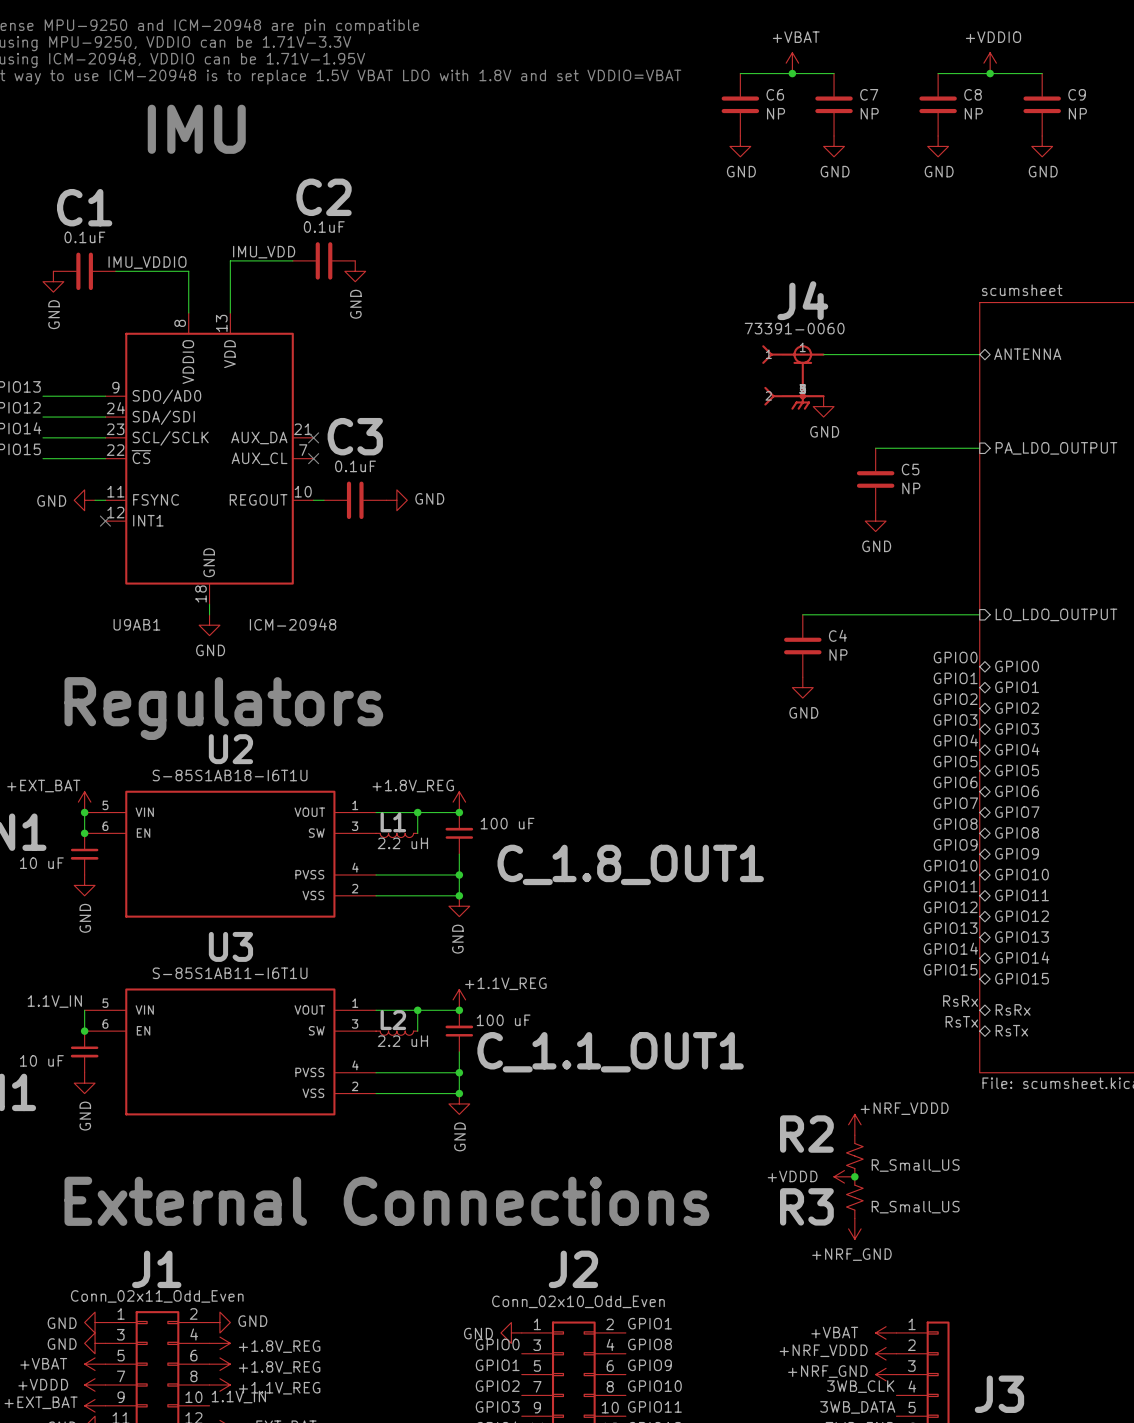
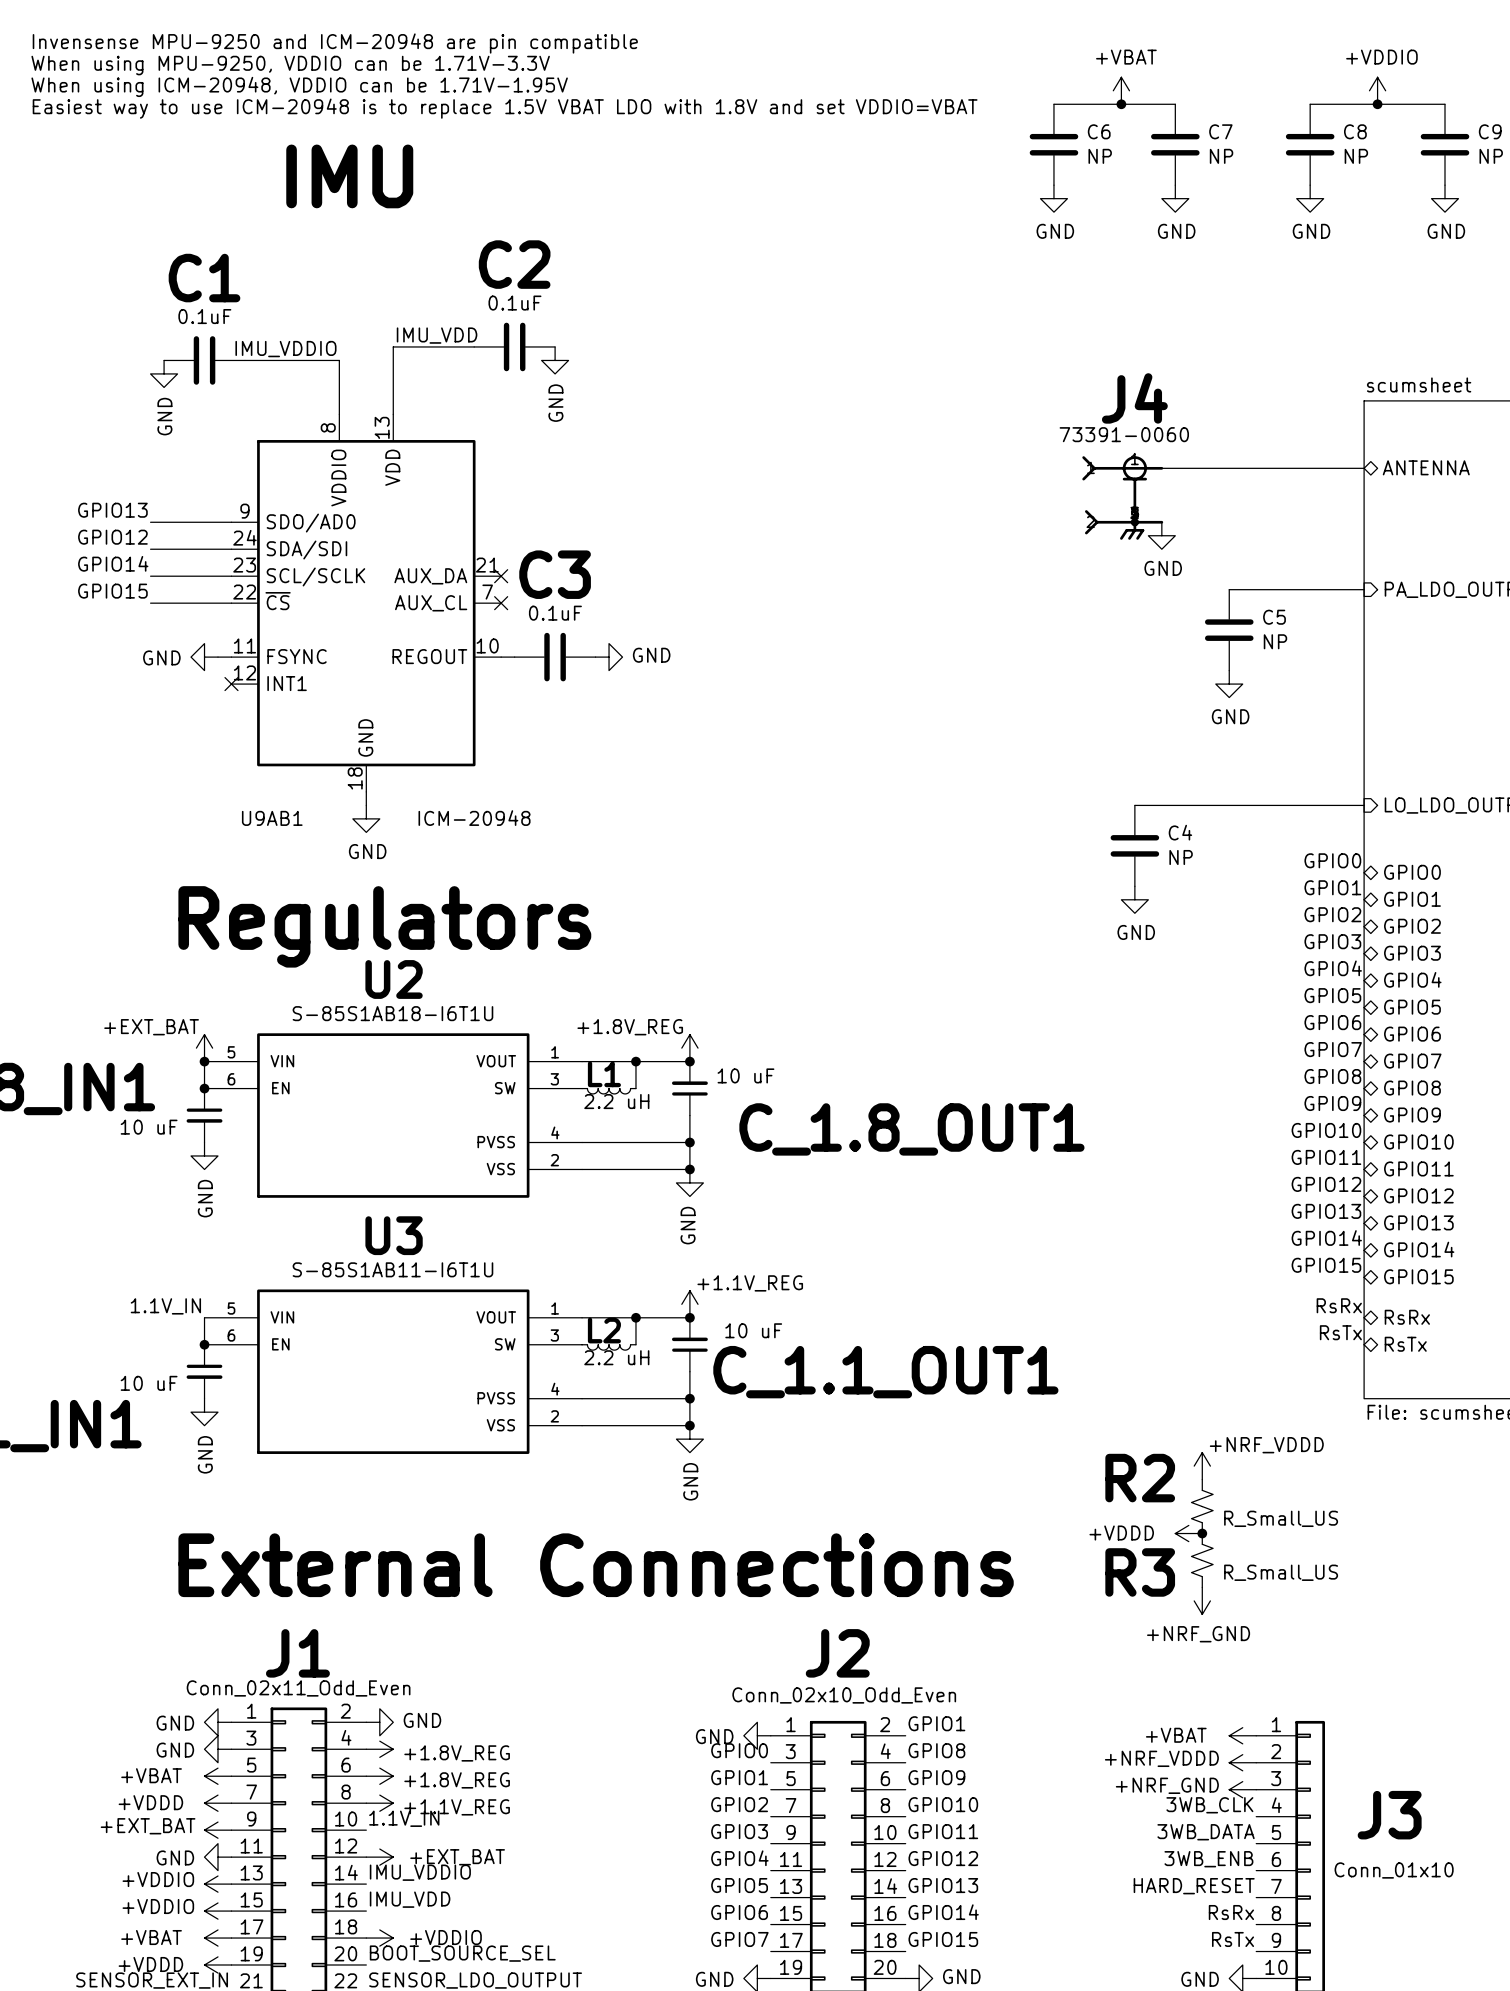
C_1.8_OUT1 value: 100 uF (507, 823) -> 10 uF (745, 1075)
C_1.1_OUT1 value: 100 uF (503, 1020) -> 10 uF (753, 1330)

